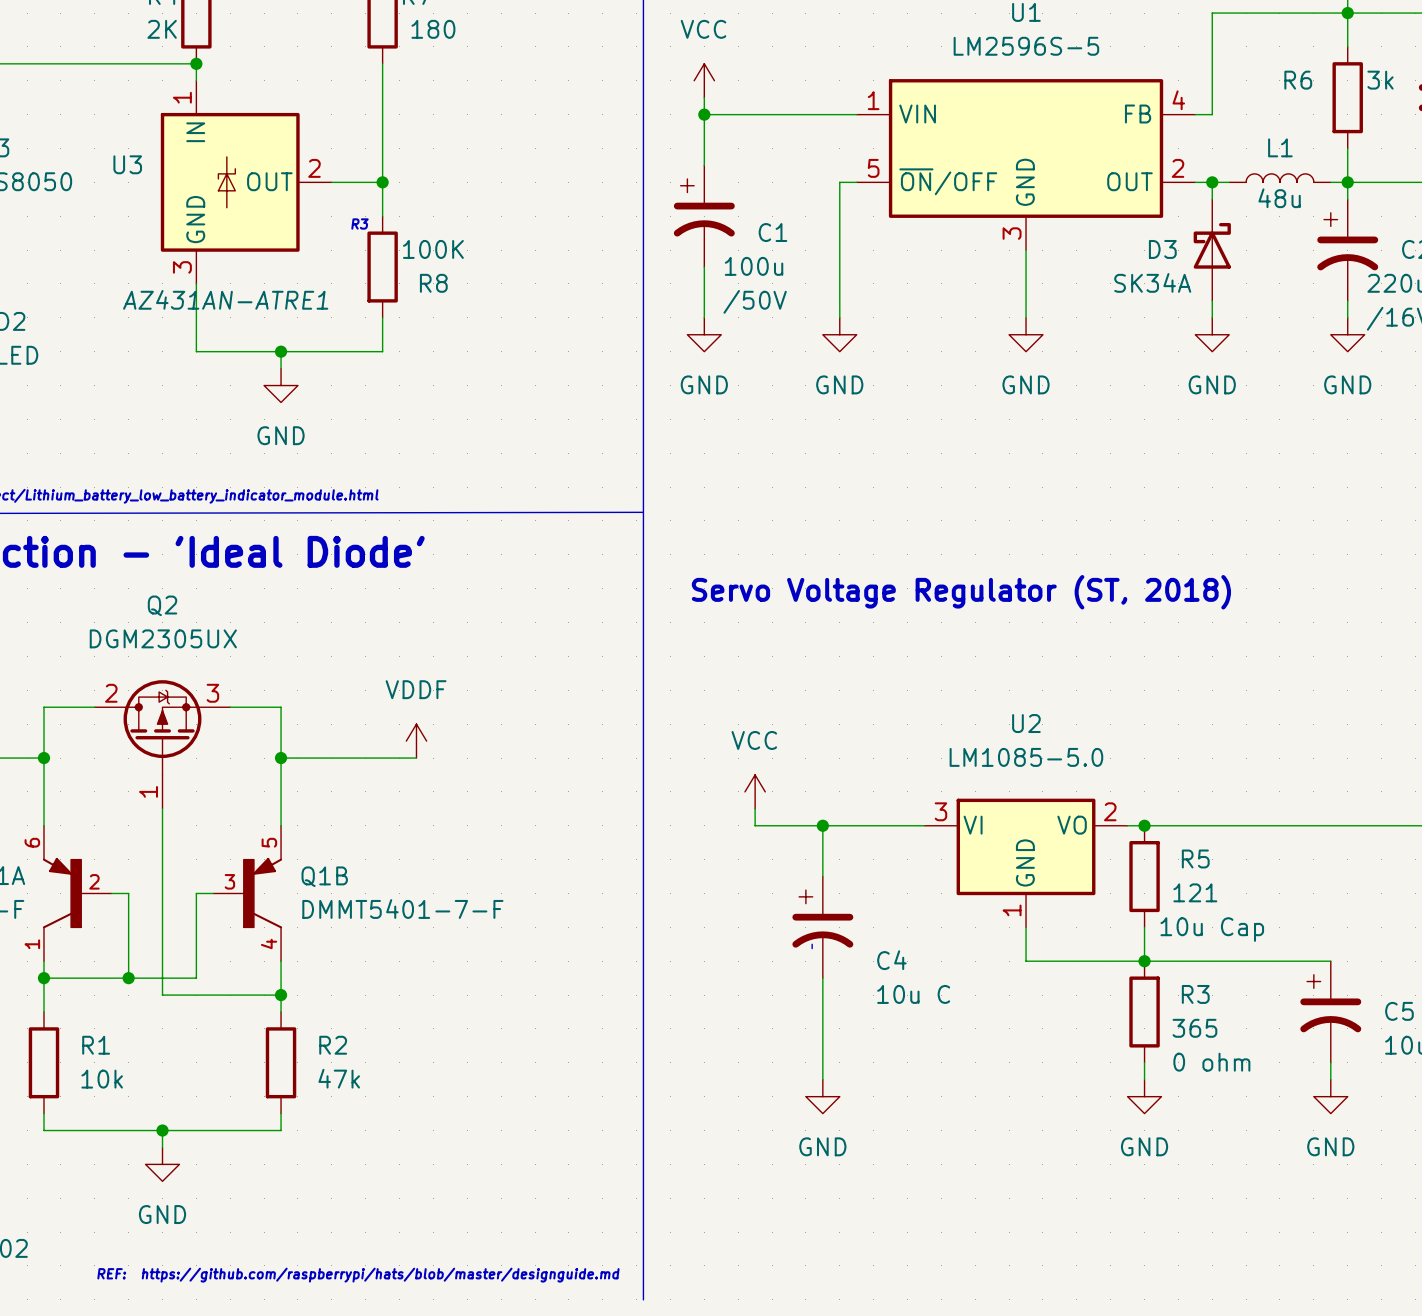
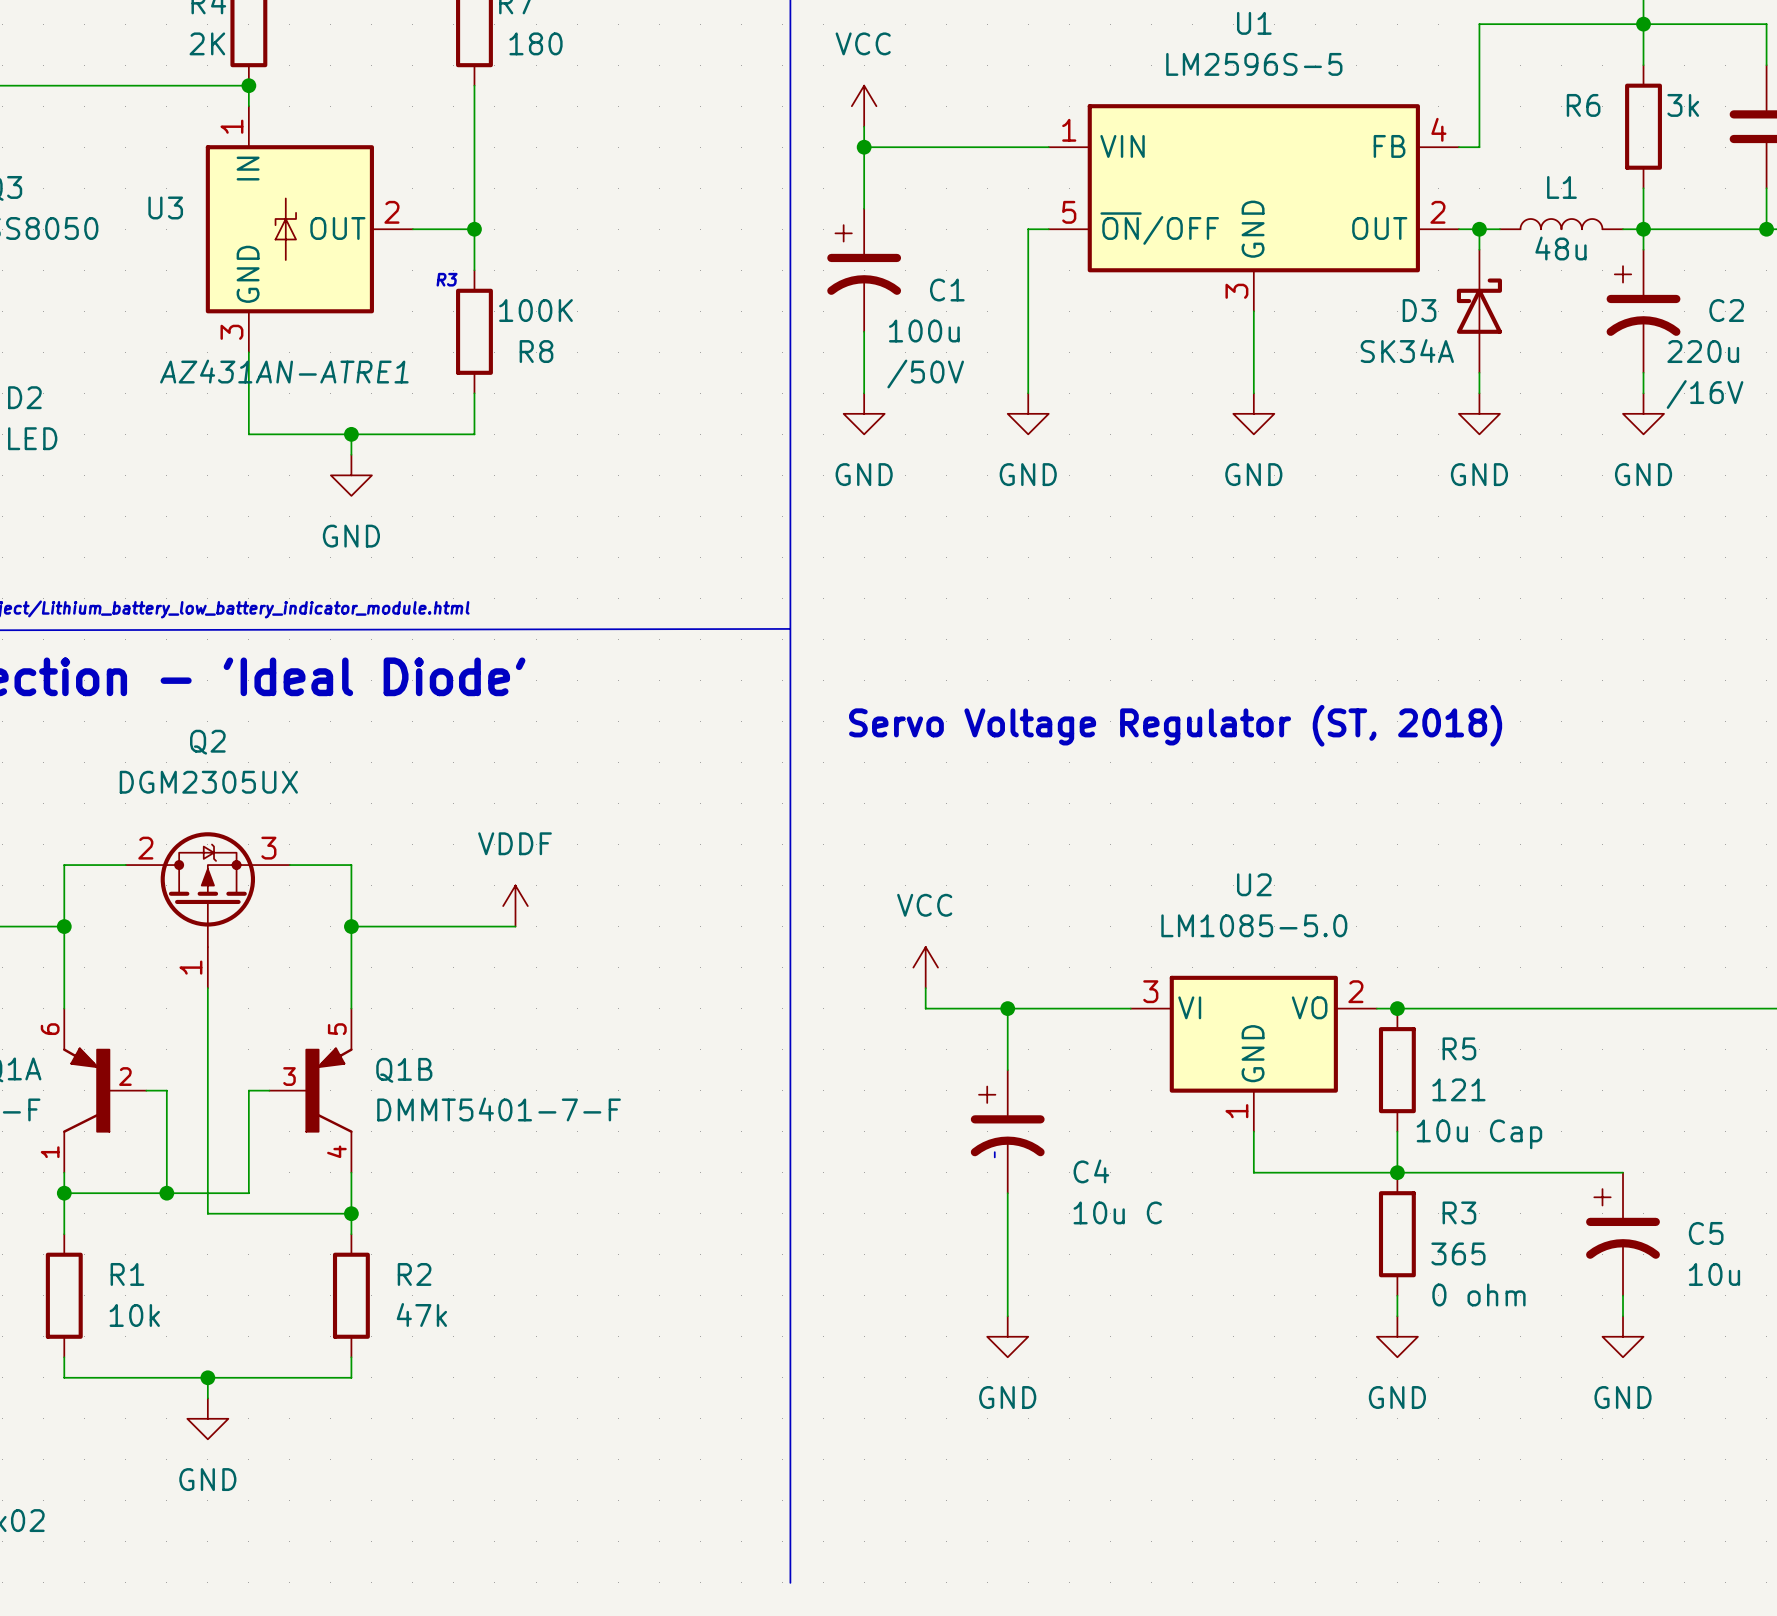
text: REF: https://github.com/raspberrypi/hats/blob/master/designguide.md (358, 1275) -> none

